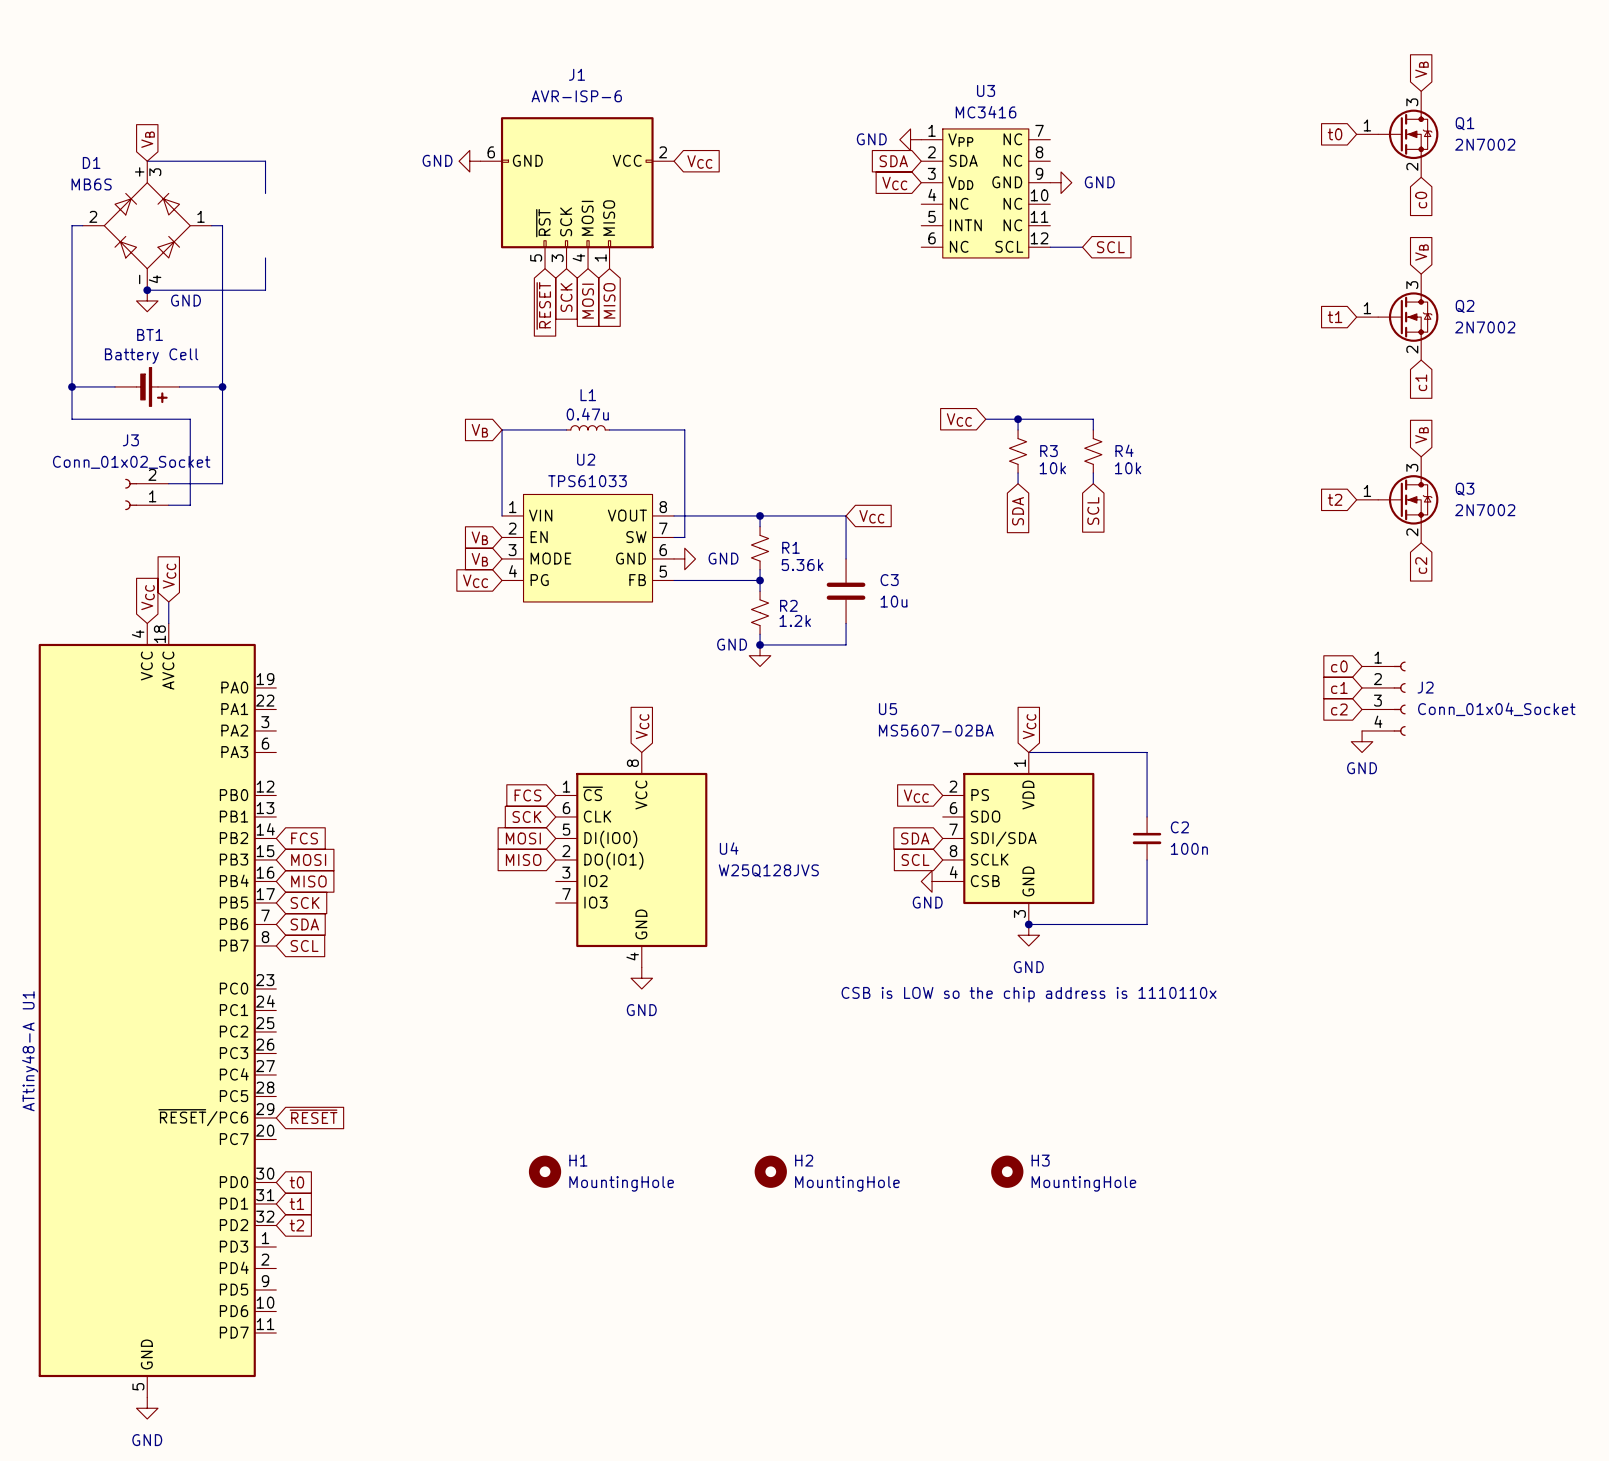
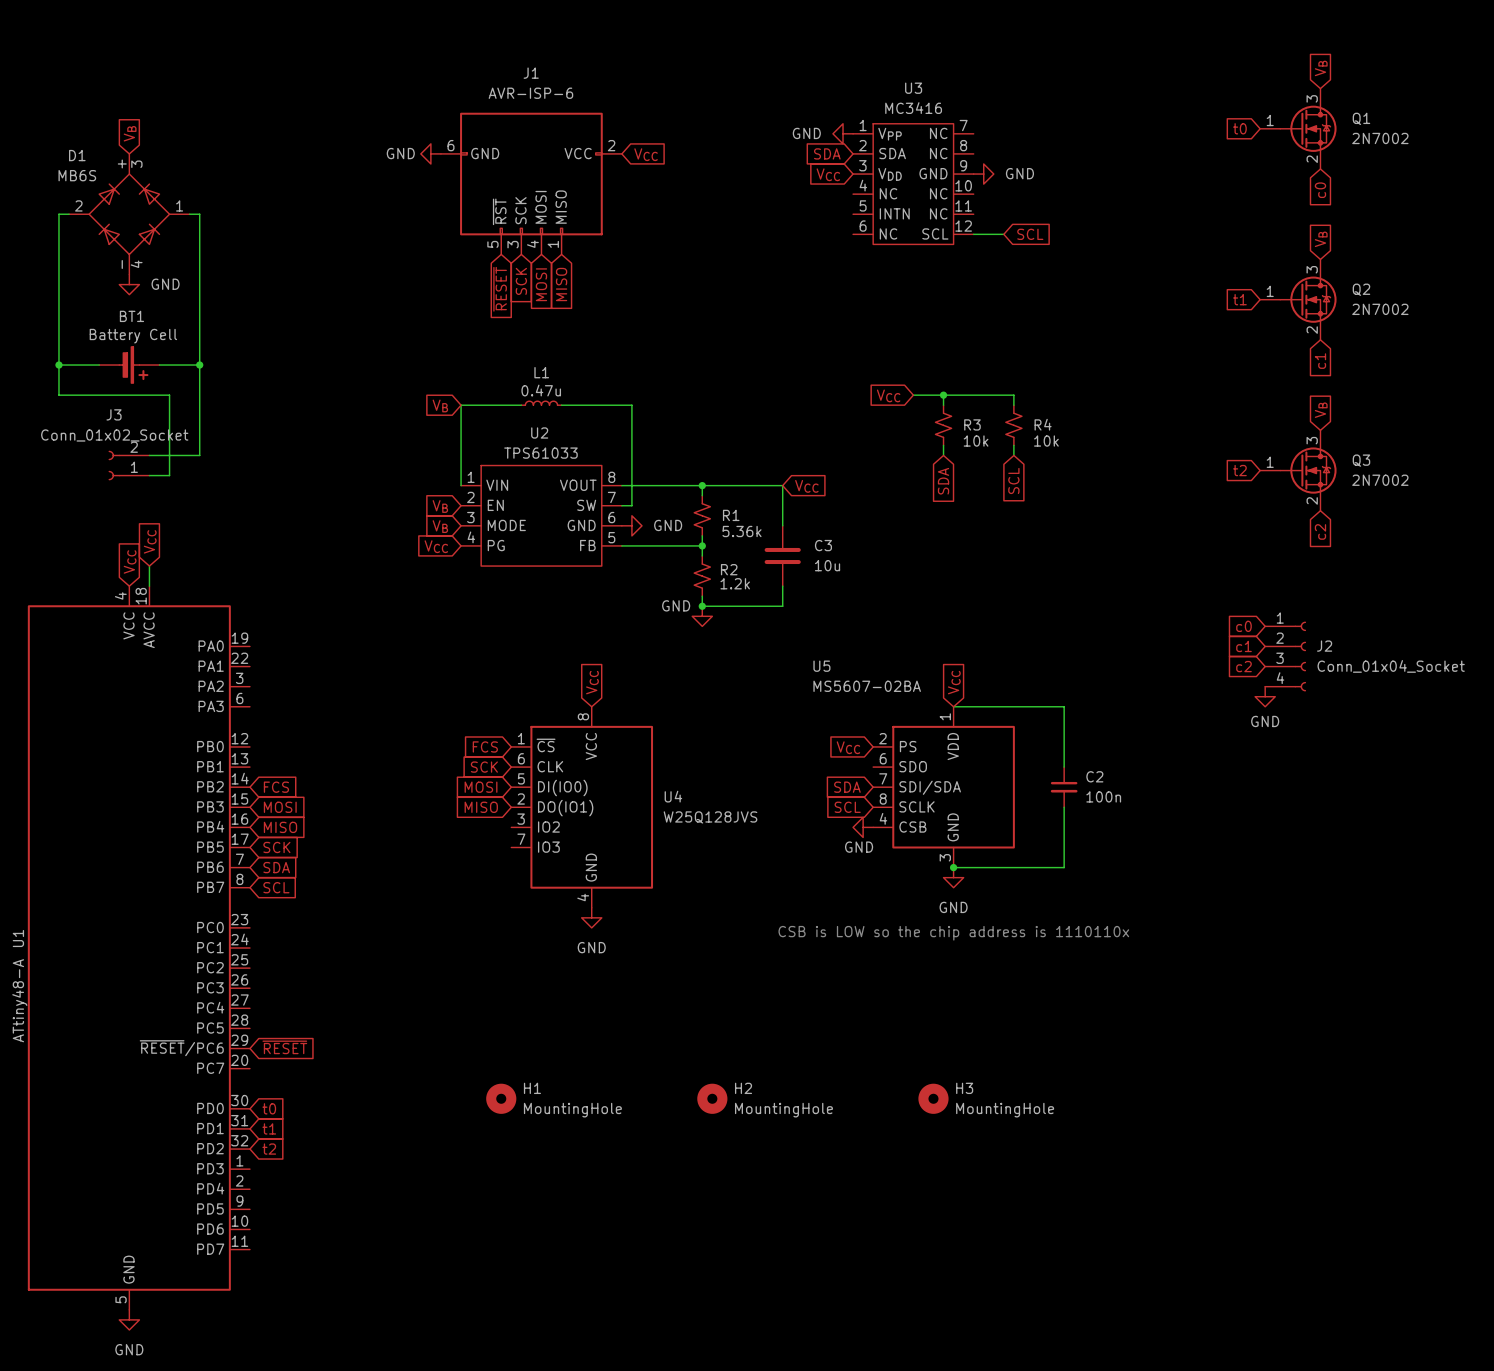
wire: (147, 161) (265, 161) (265, 193) -> none
wire: (265, 257) (265, 290) (147, 290) -> none
junction: (147, 290) -> none

